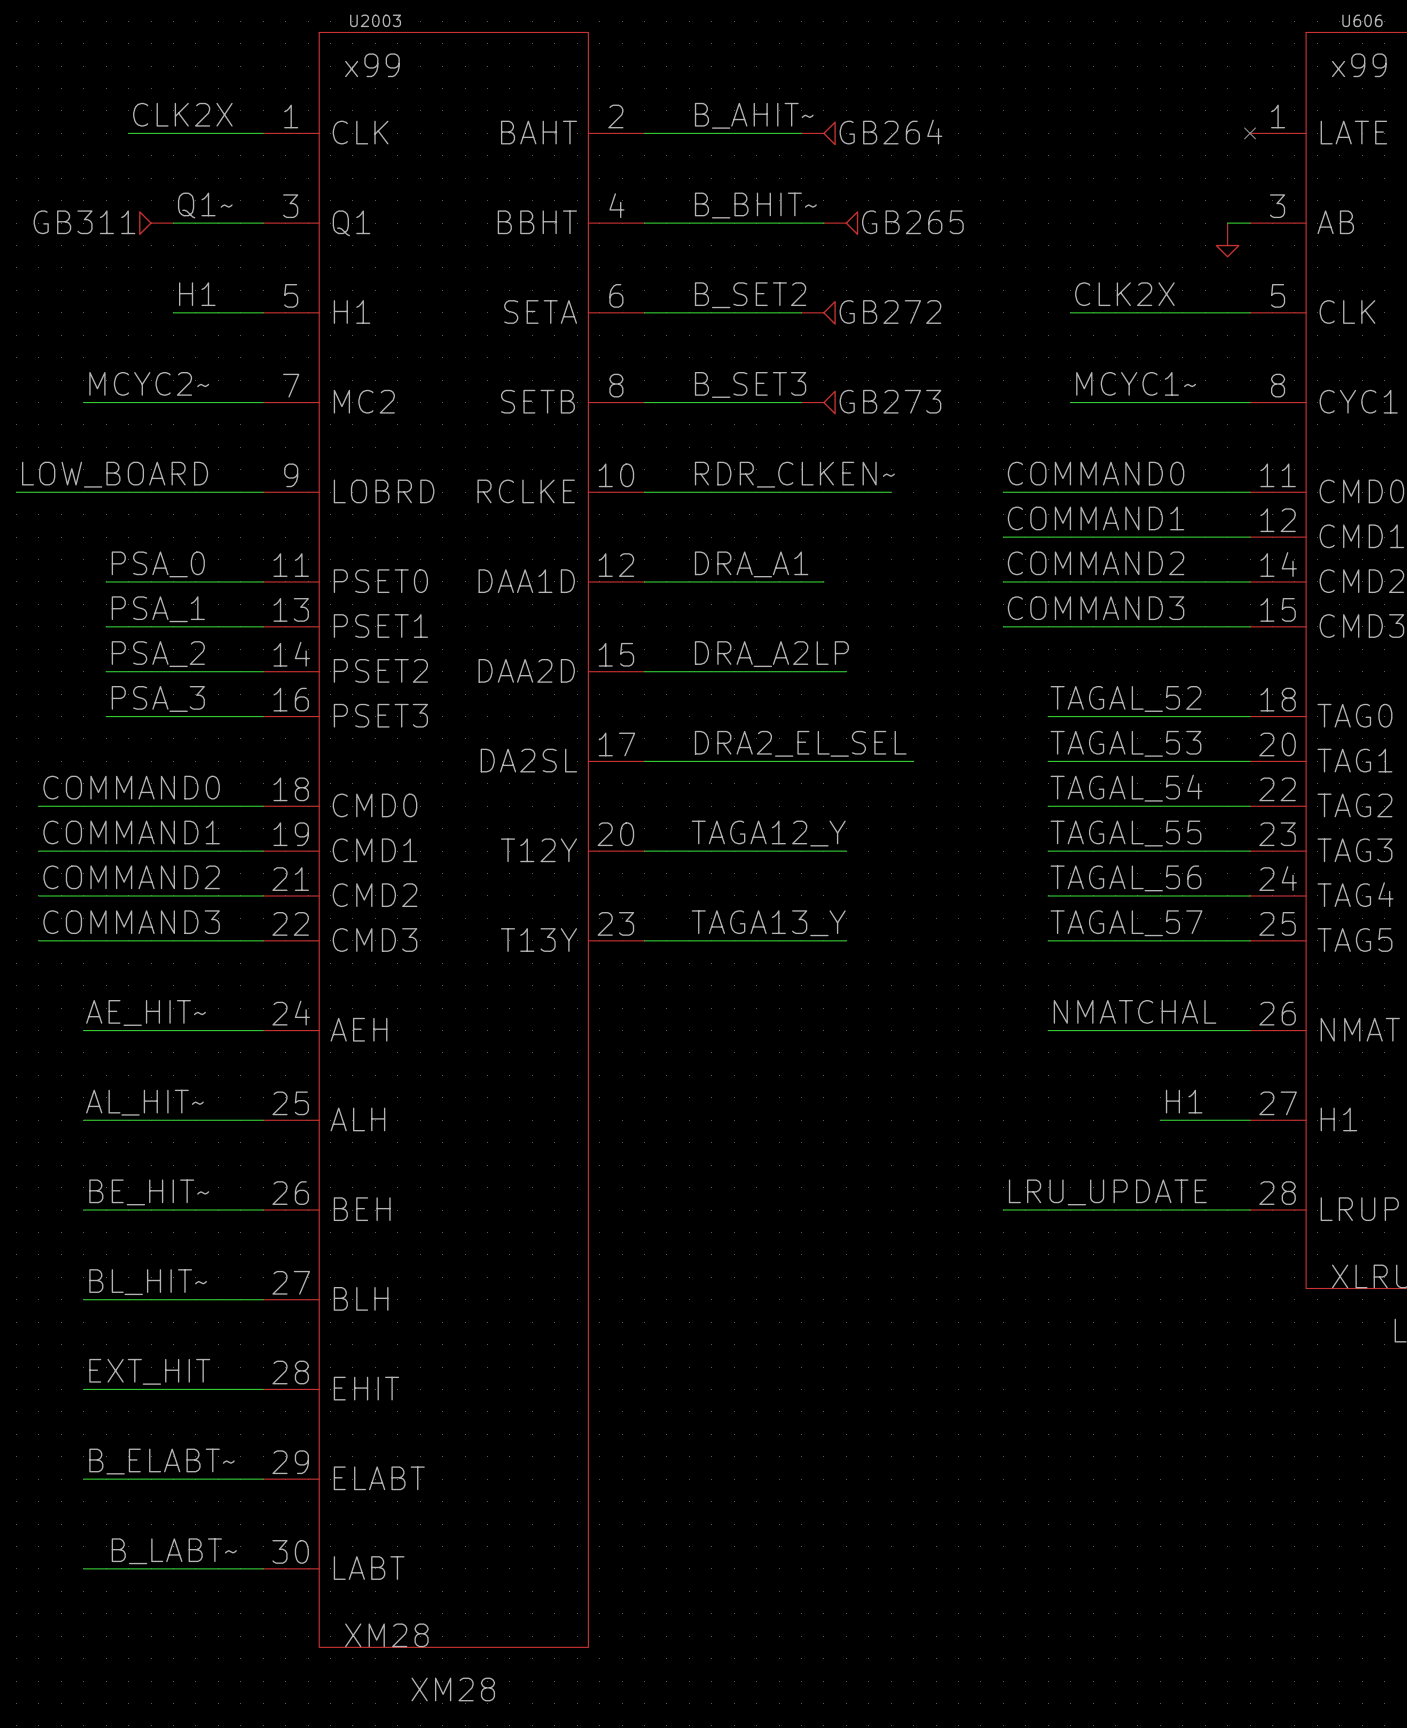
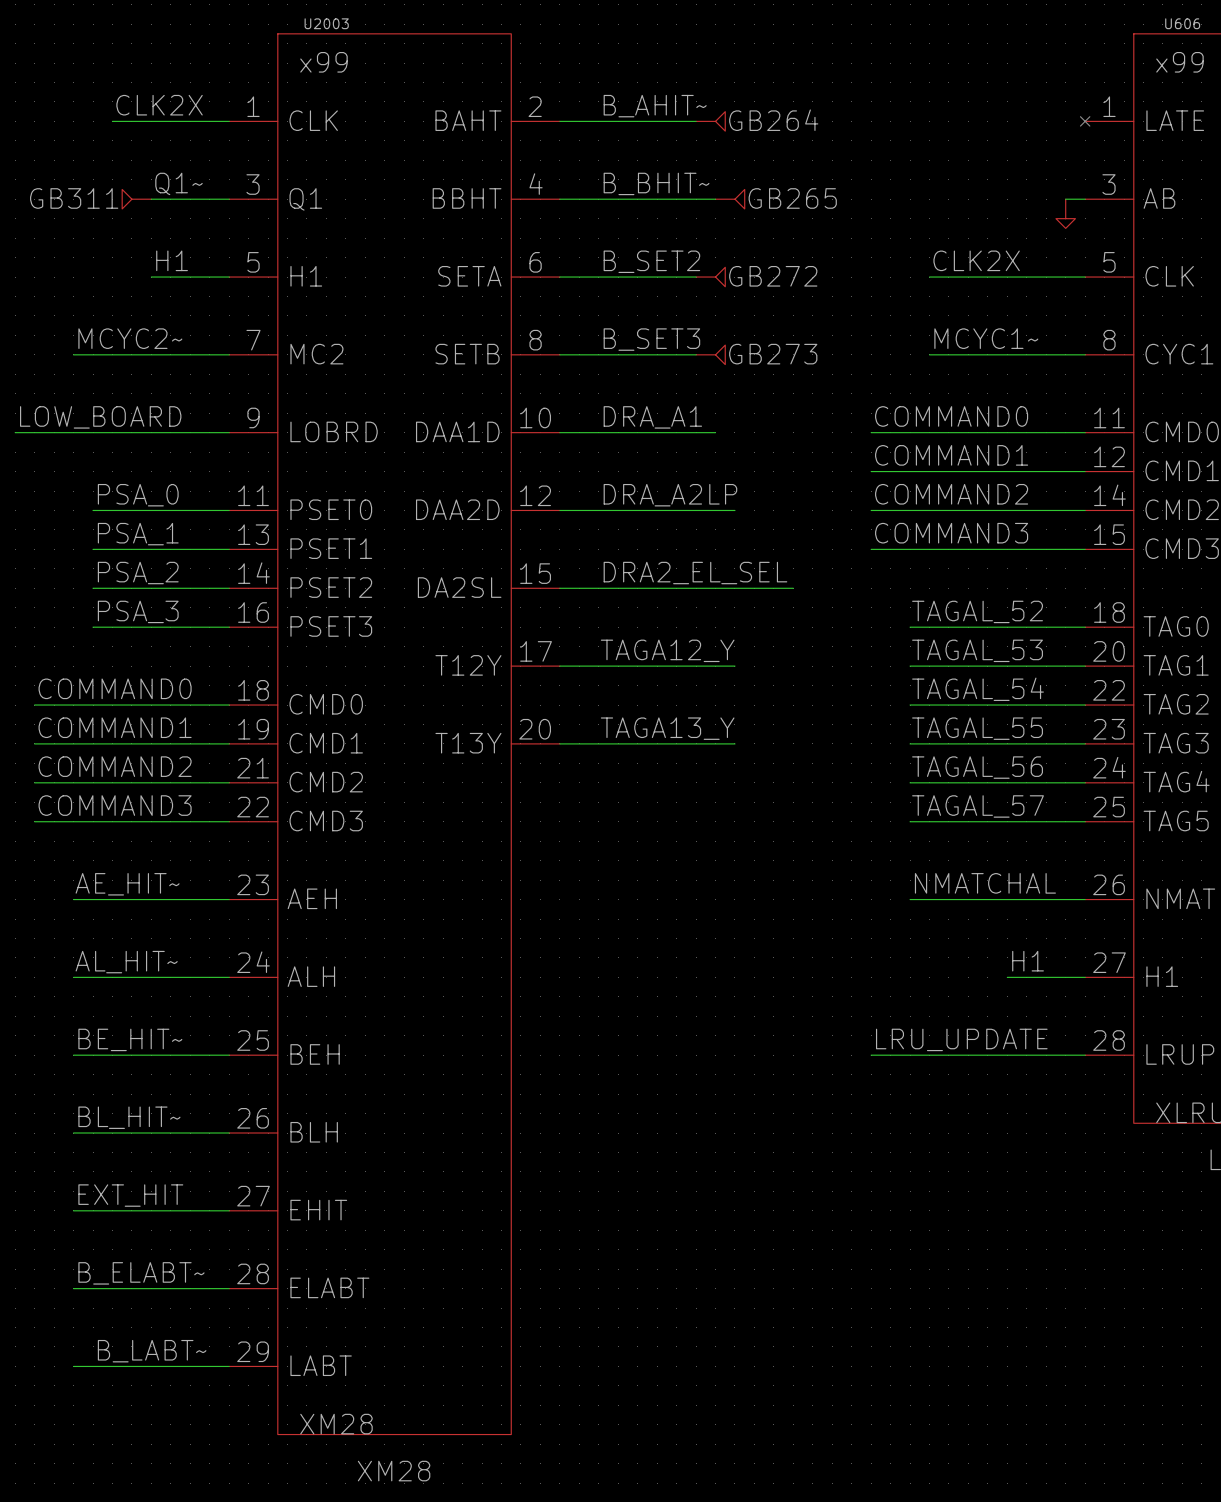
U2003 symbol: [263, 32, 645, 1648] -> [229, 33, 560, 1435]
label: RDR_CLKEN~ (794, 474) -> DRA_A1 (652, 417)
wire: (823, 492) (891, 492) -> none
label: DRA_A1 (751, 564) -> DRA_A2LP (670, 495)
wire: none -> (715, 510) (734, 510)
label: DRA_A2LP (771, 654) -> DRA2_EL_SEL (695, 573)
label: DRA2_EL_SEL (800, 743) -> TAGA12_Y (667, 650)
wire: (846, 761) (913, 761) -> (734, 588) (793, 588)
label: TAGA12_Y (768, 833) -> TAGA13_Y (667, 728)
label: TAGA13_Y (768, 923) -> none
wire: (644, 940) (846, 940) -> none

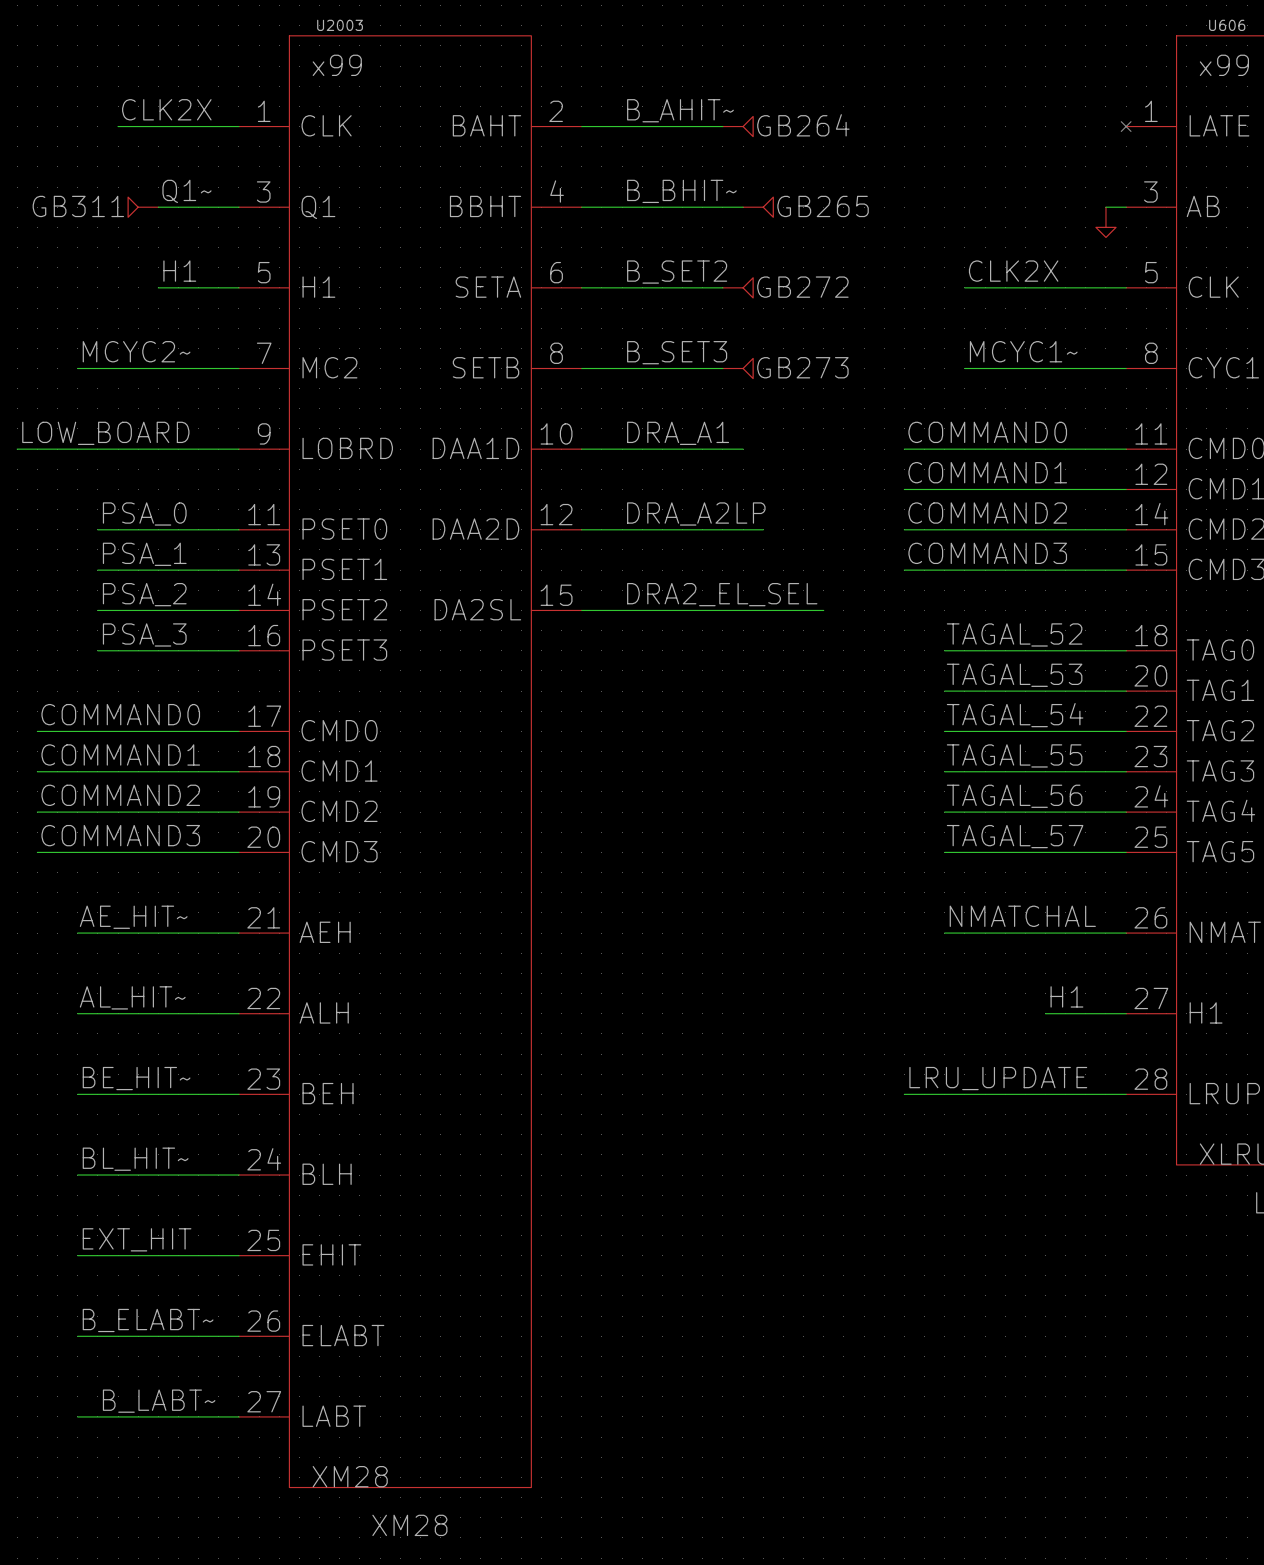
U2003 symbol: [229, 33, 560, 1435] -> [238, 35, 582, 1488]
label: TAGA12_Y (667, 650) -> none
wire: (559, 666) (734, 666) -> none
label: TAGA13_Y (667, 728) -> none
wire: (559, 743) (734, 743) -> none

